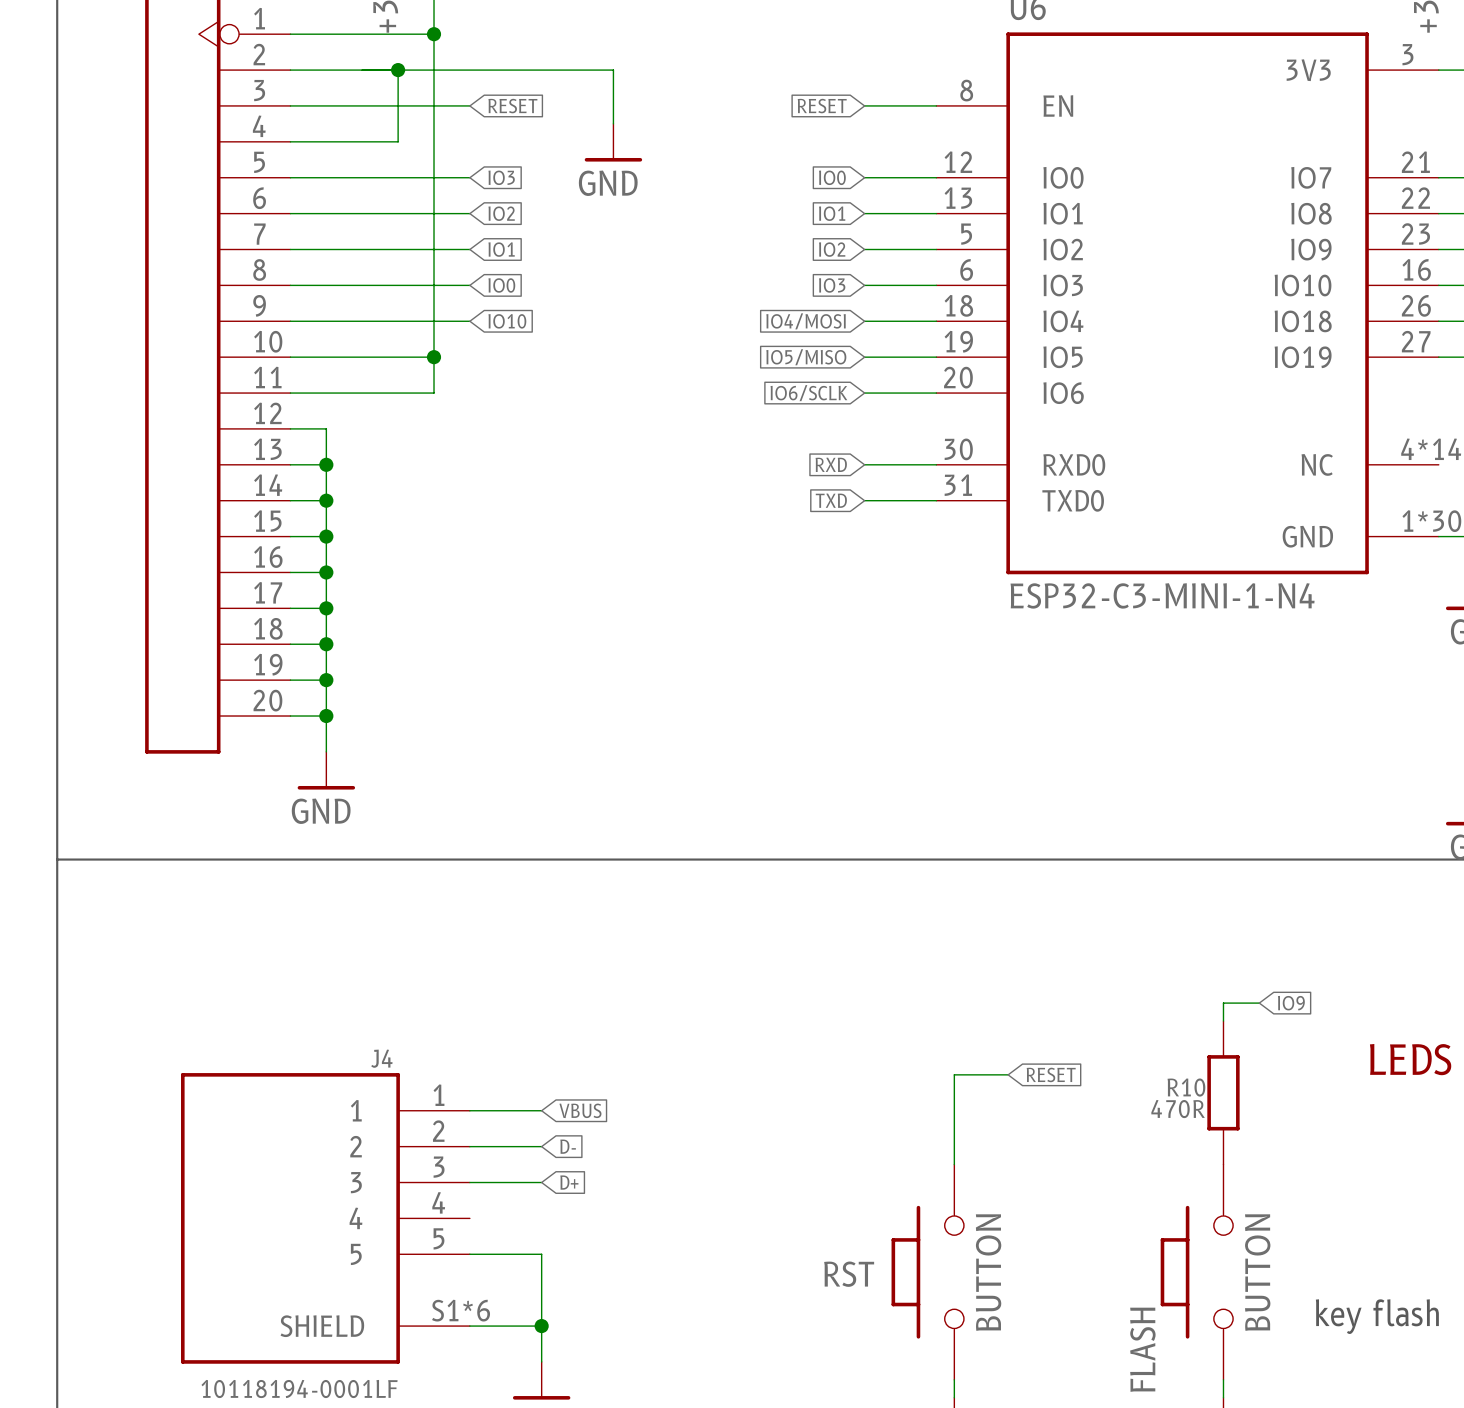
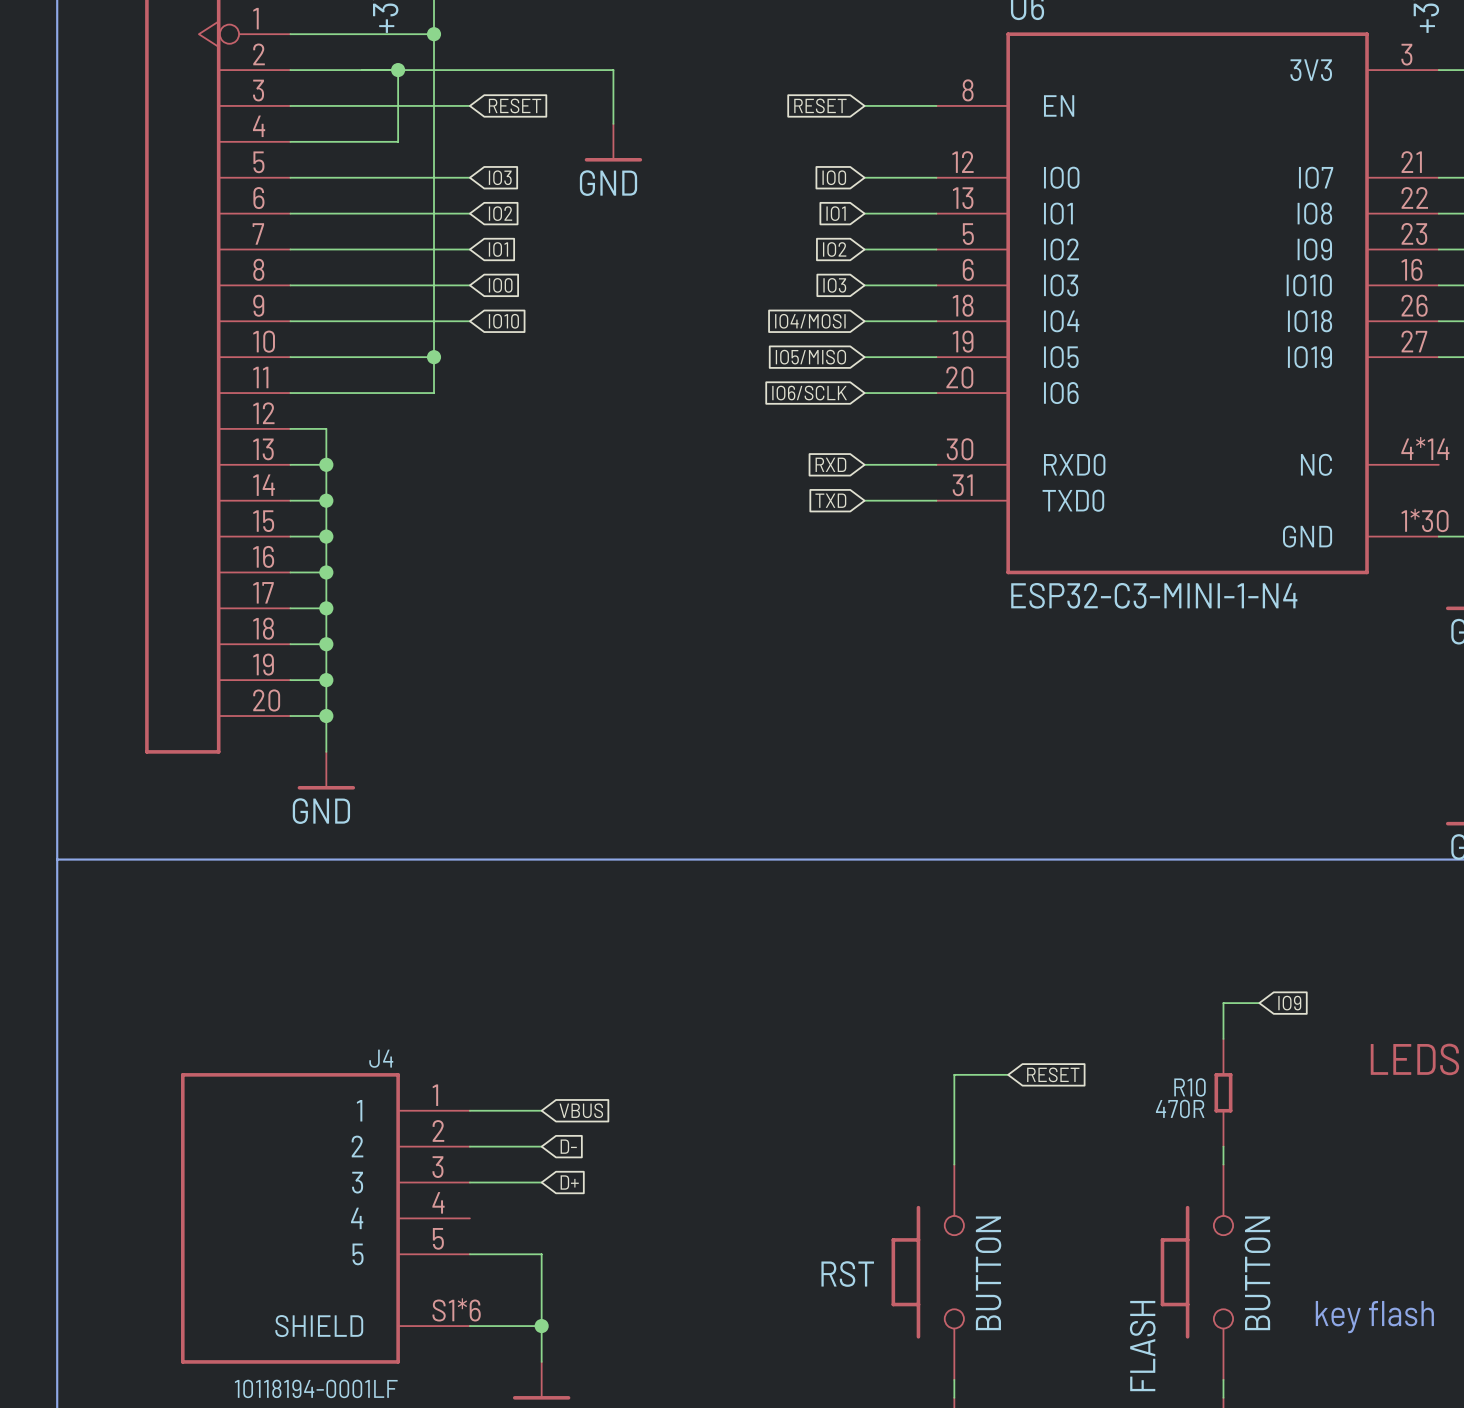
R10 symbol: [1207, 1021, 1240, 1165] -> [1214, 1038, 1233, 1147]

